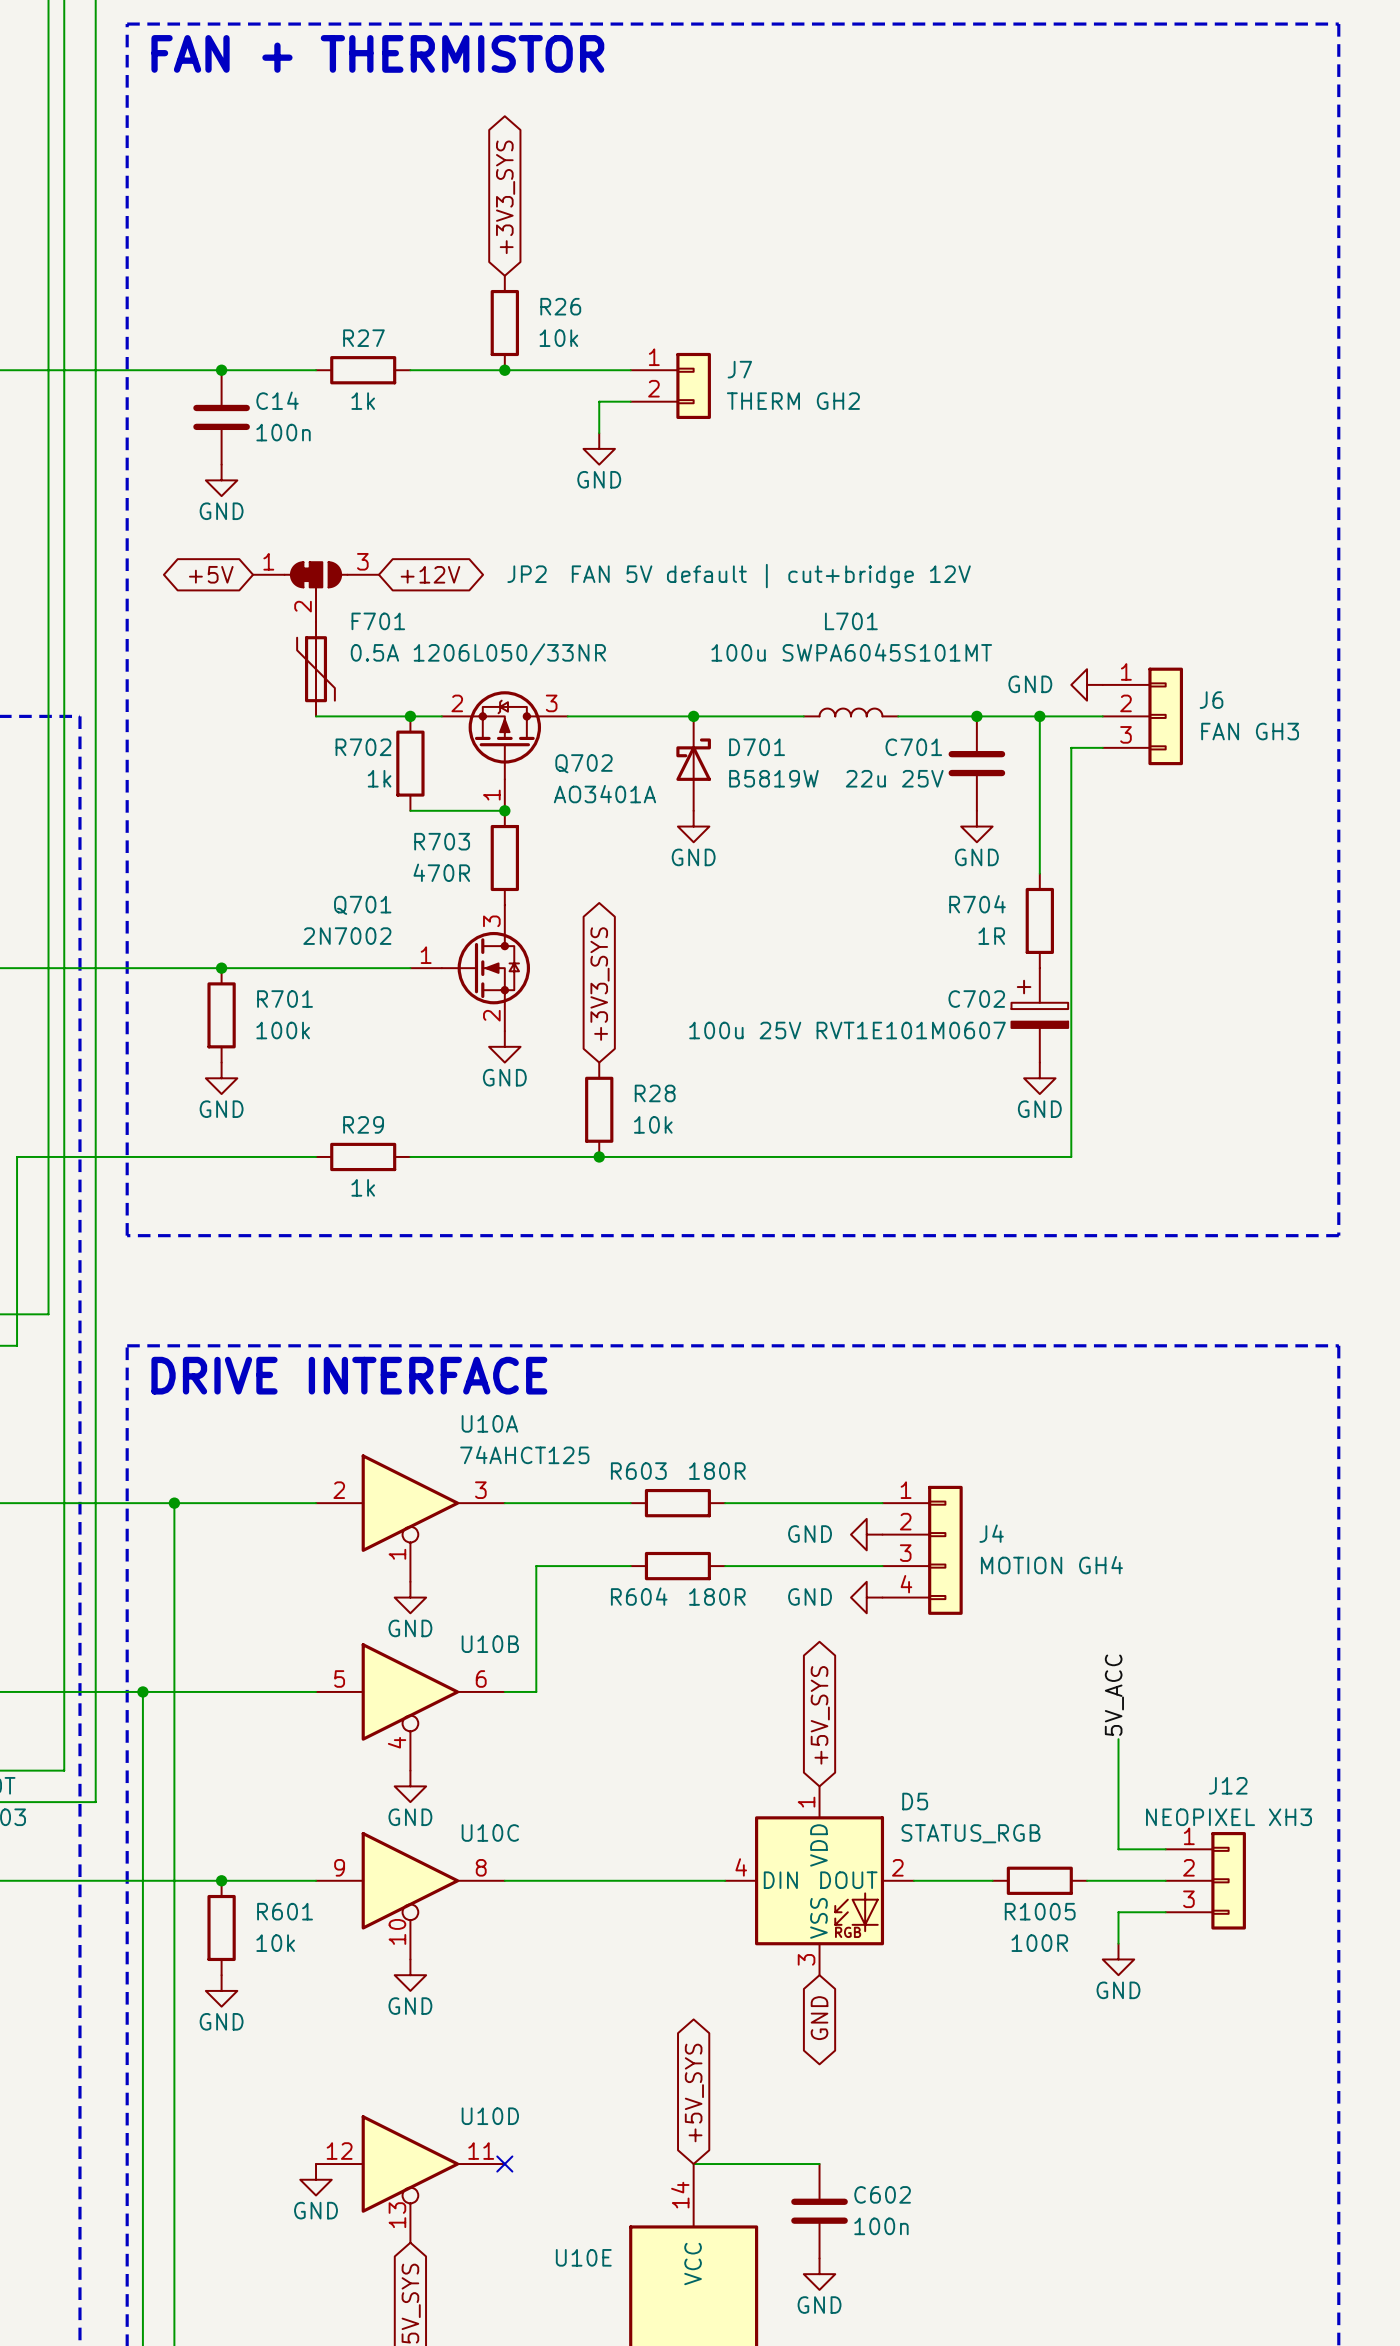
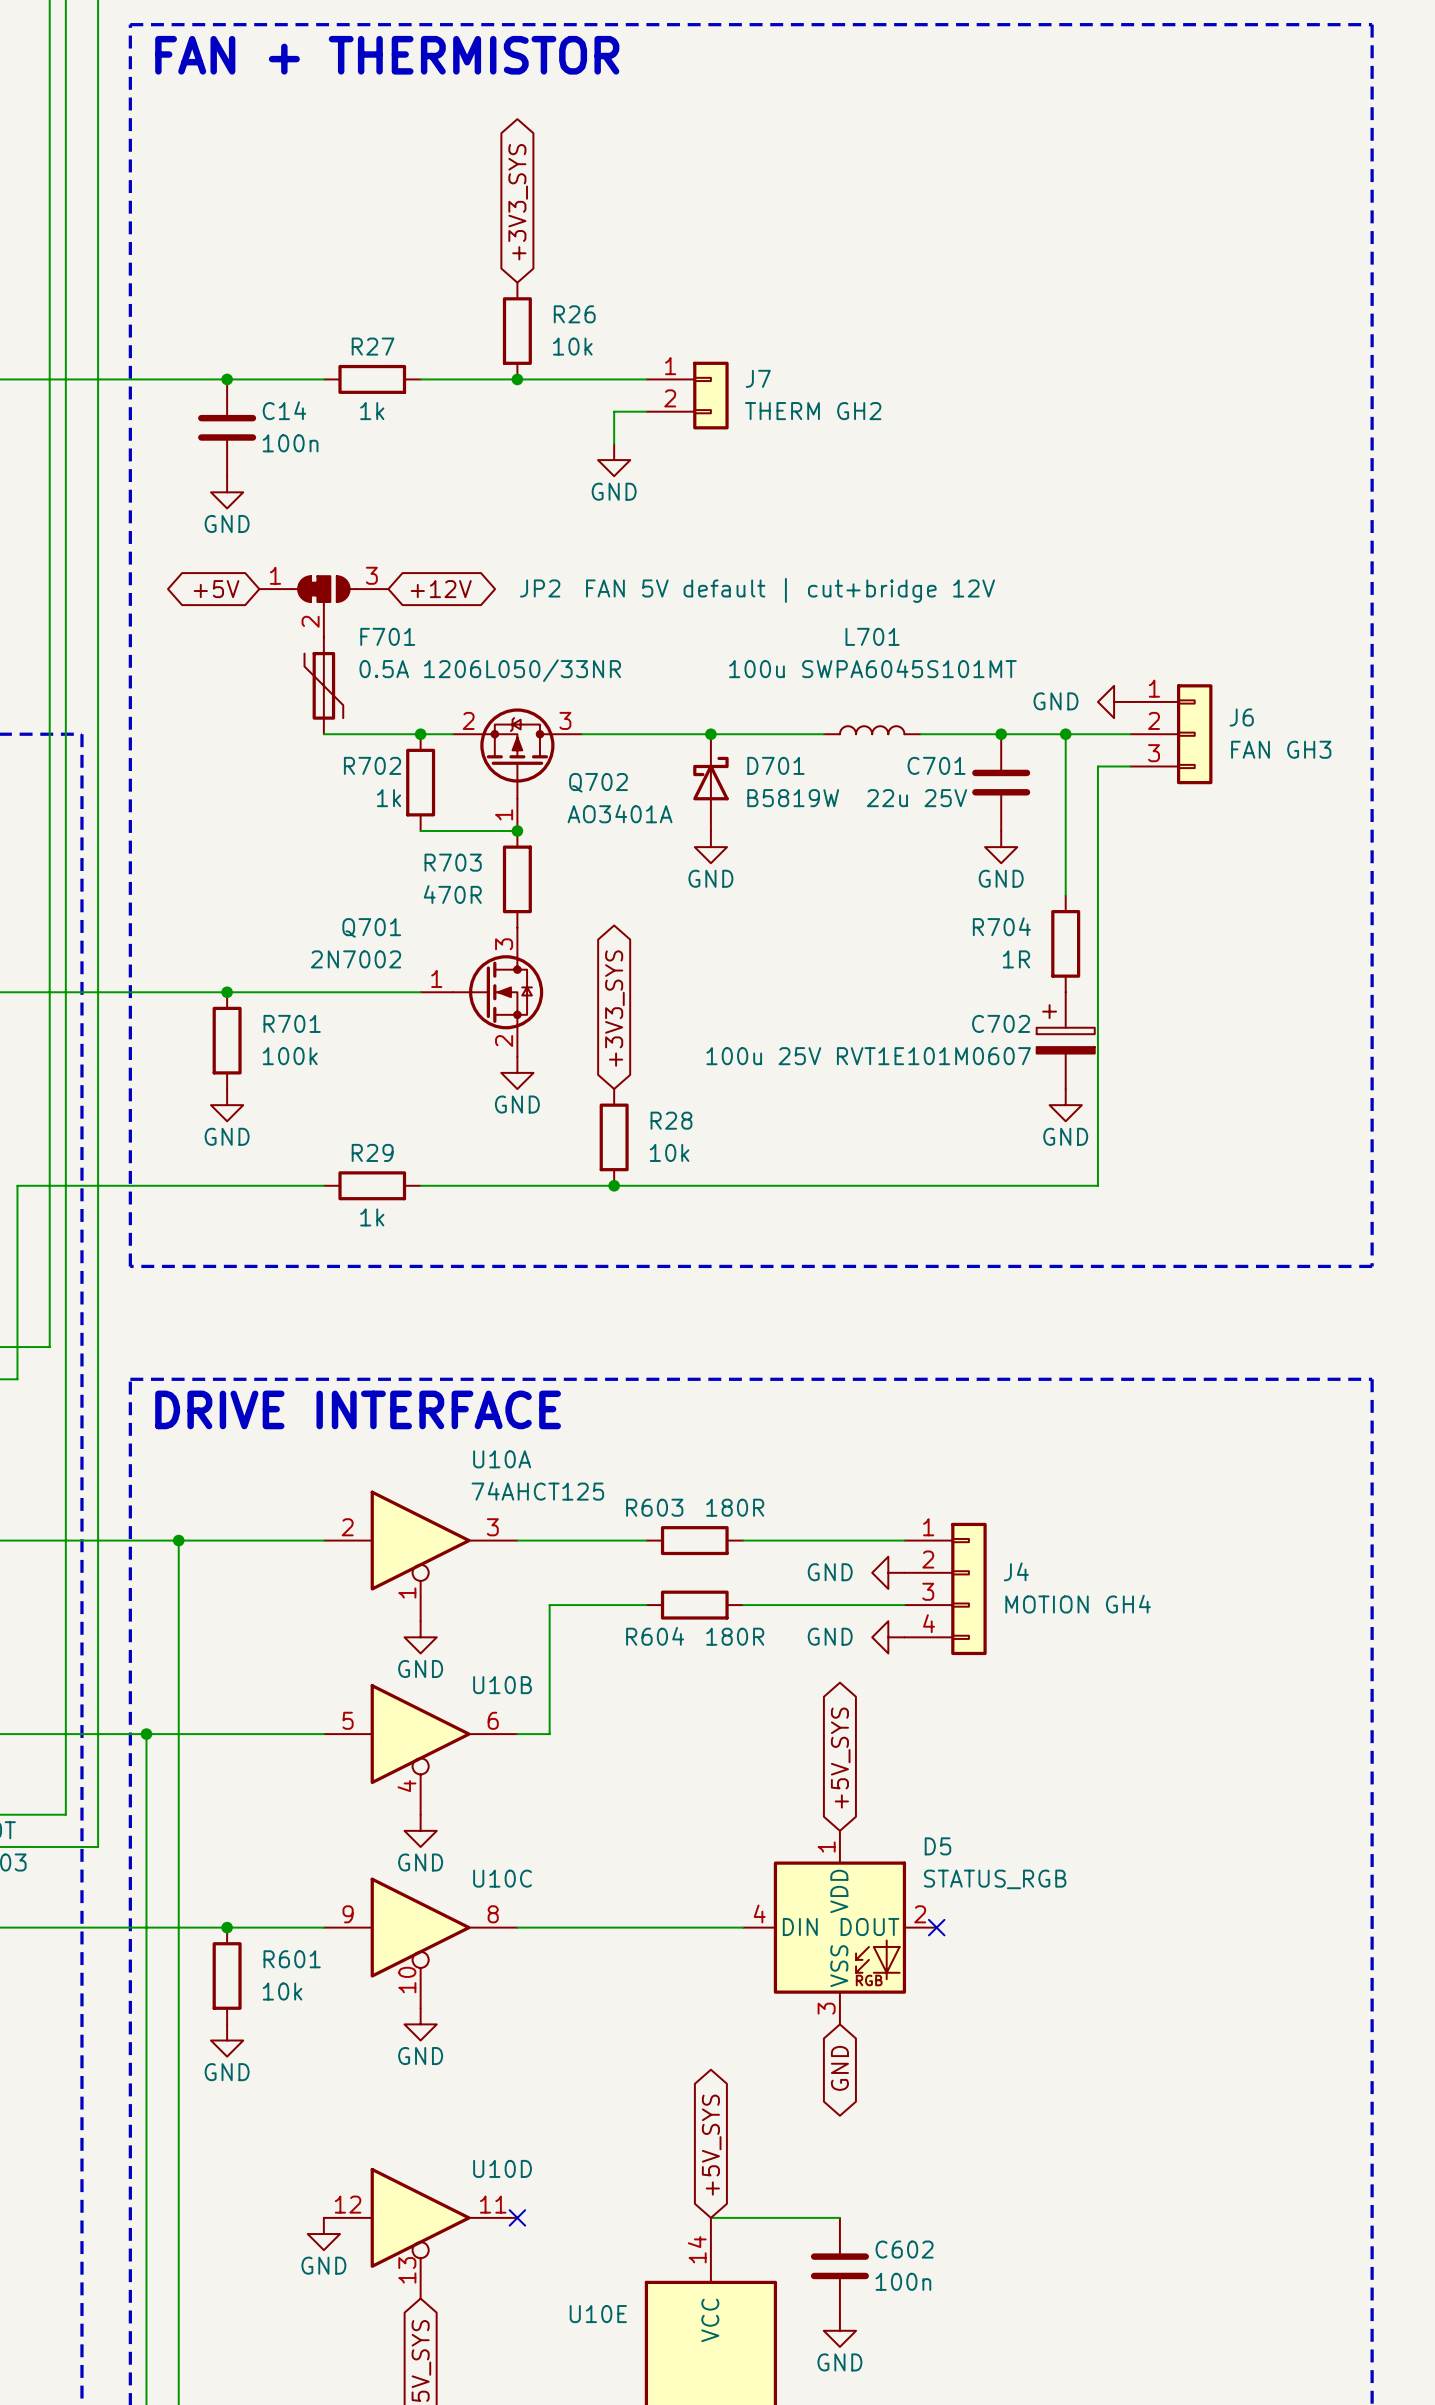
label: 5V_ACC (1114, 1695) -> none
wire: (1118, 1739) (1118, 1849) (1165, 1849) -> none
wire: (913, 1880) (992, 1880) -> none
no-connect mark: none -> (936, 1927)
R1005: 100R (1039, 1880) -> none
wire: (1087, 1880) (1165, 1880) -> none
J12: NEOPIXEL XH3 (1205, 1880) -> none
wire: (1165, 1912) (1118, 1912) (1118, 1943) -> none
power symbol: GND (1118, 1959) -> none

